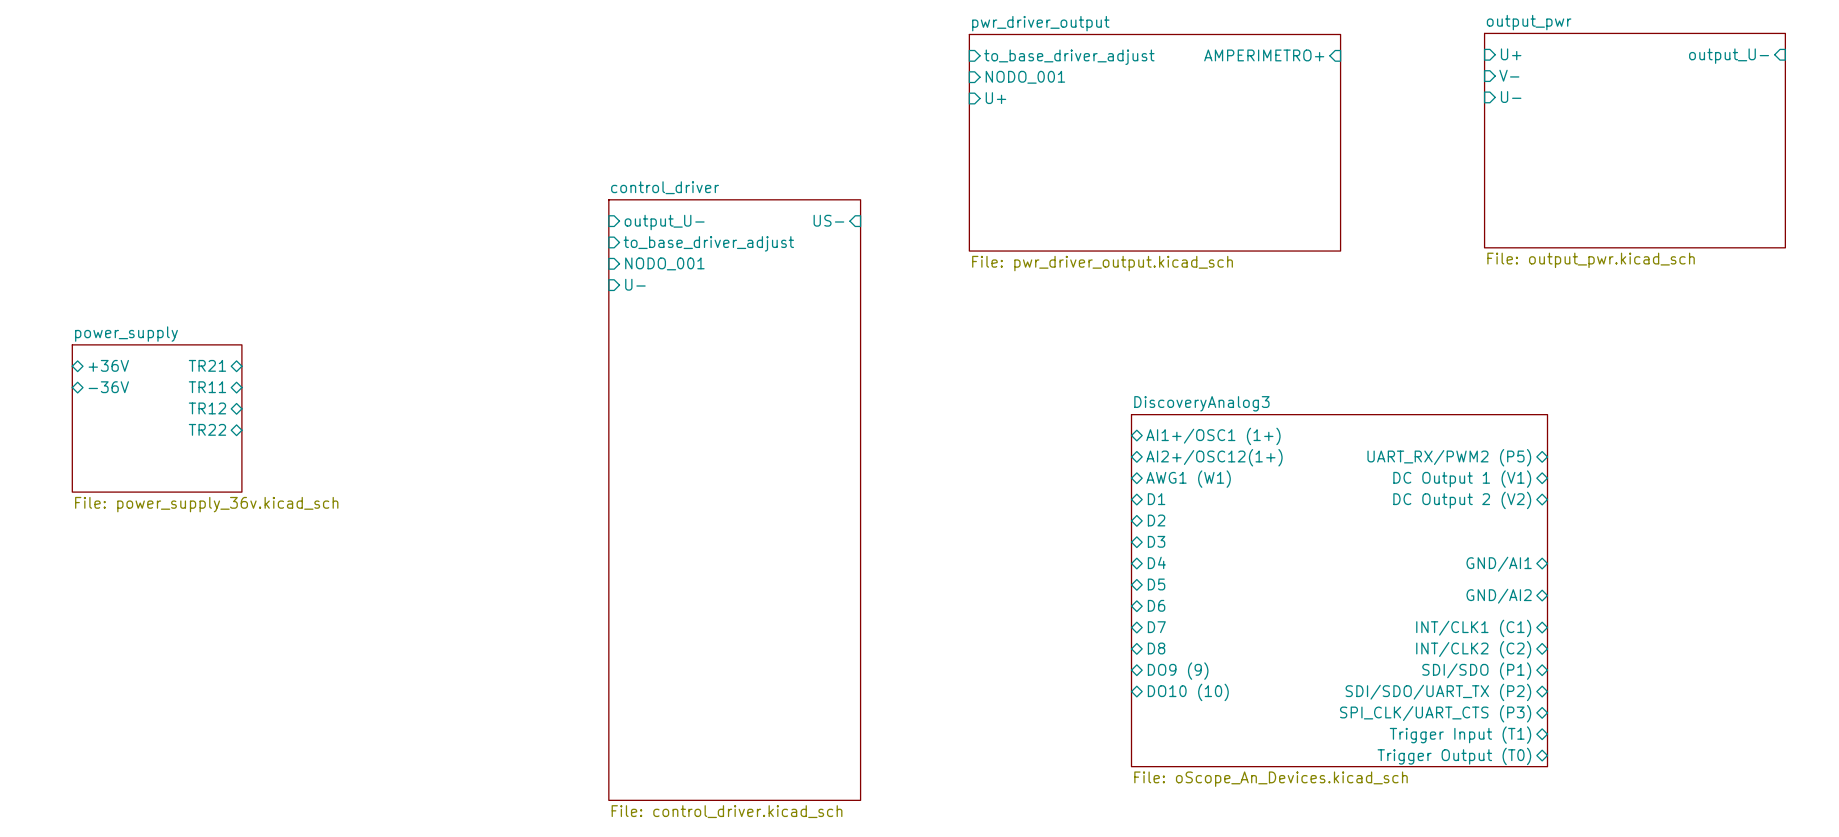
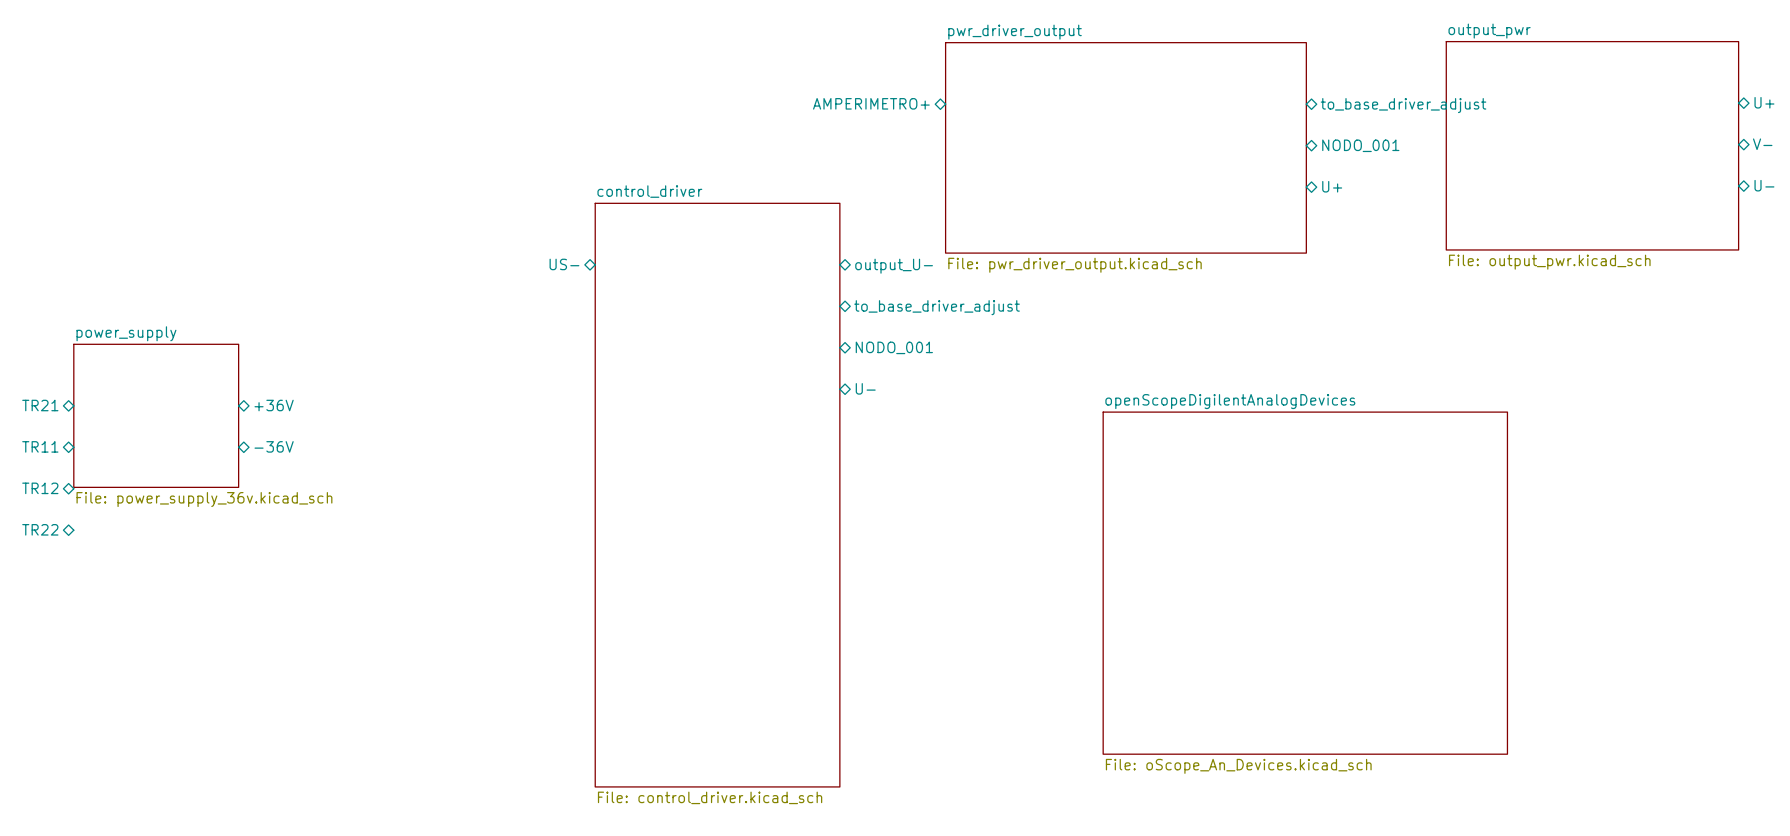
sheet pin: U+ (1511, 54) -> none
sheet pin: AMPERIMETRO+ (1264, 55) -> none
sheet pin: output_U- (1729, 56) -> none
sheet pin: to_base_driver_adjust (1069, 57) -> none
sheet pin: V- (1509, 75) -> none
sheet pin: NODO_001 (1025, 77) -> none
sheet pin: none -> U+ (1764, 102)
sheet pin: none -> AMPERIMETRO+ (871, 103)
sheet pin: U- (1511, 97) -> none
sheet pin: U+ (995, 98) -> none
sheet pin: none -> to_base_driver_adjust (1403, 105)
sheet pin: none -> V- (1762, 144)
sheet pin: none -> NODO_001 (1360, 145)
sheet pin: none -> U- (1764, 185)
sheet pin: none -> U+ (1332, 186)
sheet pin: US- (828, 220) -> none
sheet pin: output_U- (664, 222) -> none
sheet pin: to_base_driver_adjust (708, 243) -> none
sheet pin: none -> US- (564, 264)
sheet pin: NODO_001 (664, 263) -> none
sheet pin: none -> output_U- (894, 266)
sheet pin: U- (635, 284) -> none
sheet pin: none -> to_base_driver_adjust (937, 307)
sheet pin: none -> NODO_001 (894, 347)
sheet pin position: +36V (108, 365) -> +36V (274, 405)
sheet pin position: TR21 (207, 365) -> TR21 (40, 405)
sheet pin position: -36V (108, 387) -> -36V (274, 446)
sheet pin position: TR11 (207, 387) -> TR11 (40, 446)
sheet pin: none -> U- (865, 388)
sheet DiscoveryAnalog3 name: DiscoveryAnalog3 (1201, 403) -> openScopeDigilentAnalogDevices (1230, 401)
sheet pin position: TR12 (207, 408) -> TR12 (40, 488)
sheet pin position: TR22 (207, 429) -> TR22 (40, 529)
sheet pin: AI1+/OSC1 (1+) (1213, 436) -> none
sheet pin: AI2+/OSC12(1+) (1214, 457) -> none
sheet pin: UART_RX/PWM2 (P5) (1449, 457) -> none
sheet pin: AWG1 (W1) (1188, 479) -> none
sheet pin: DC Output 1 (V1) (1462, 479) -> none
sheet pin: D1 (1156, 499) -> none
sheet pin: DC Output 2 (V2) (1462, 500) -> none
sheet pin: D2 (1156, 520) -> none
sheet pin: D3 (1156, 541) -> none
sheet pin: D4 (1156, 562) -> none
sheet pin: GND/AI1 (1499, 564) -> none
sheet pin: D5 (1156, 584) -> none
sheet pin: GND/AI2 (1499, 596) -> none
sheet pin: D6 (1156, 605) -> none
sheet pin: D7 (1156, 627) -> none
sheet pin: INT/CLK1 (C1) (1473, 628) -> none
sheet pin: D8 (1156, 648) -> none
sheet pin: INT/CLK2 (C2) (1473, 649) -> none
sheet pin: DO9 (9) (1178, 671) -> none
sheet pin: SDI/SDO (P1) (1476, 671) -> none
sheet pin: DO10 (10) (1188, 692) -> none
sheet pin: SDI/SDO/UART_TX (P2) (1438, 692) -> none
sheet pin: SPI_CLK/UART_CTS (P3) (1435, 713) -> none
sheet pin: Trigger Input (T1) (1460, 735) -> none
sheet pin: Trigger Output (T0) (1454, 756) -> none

